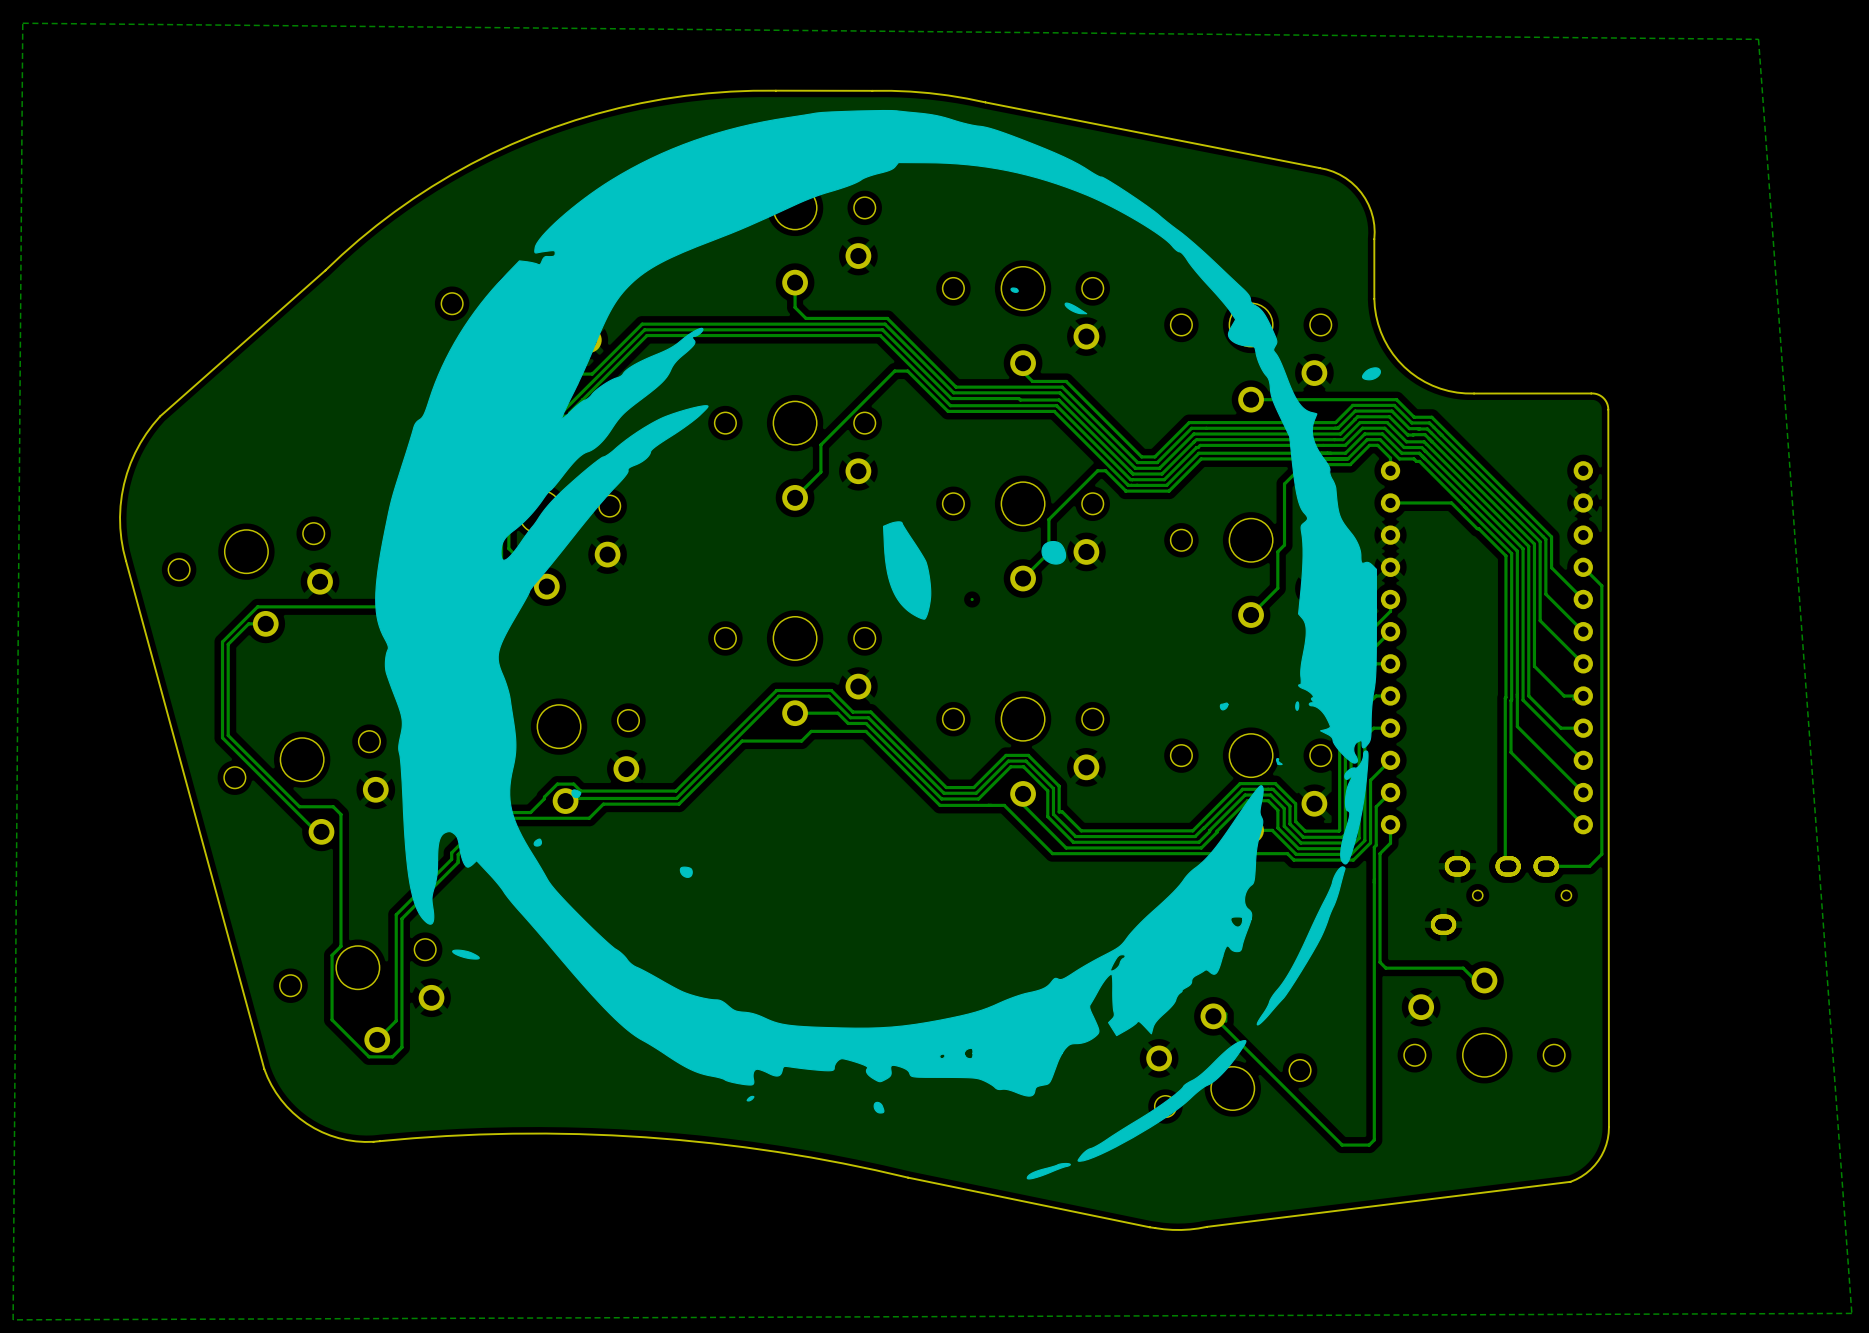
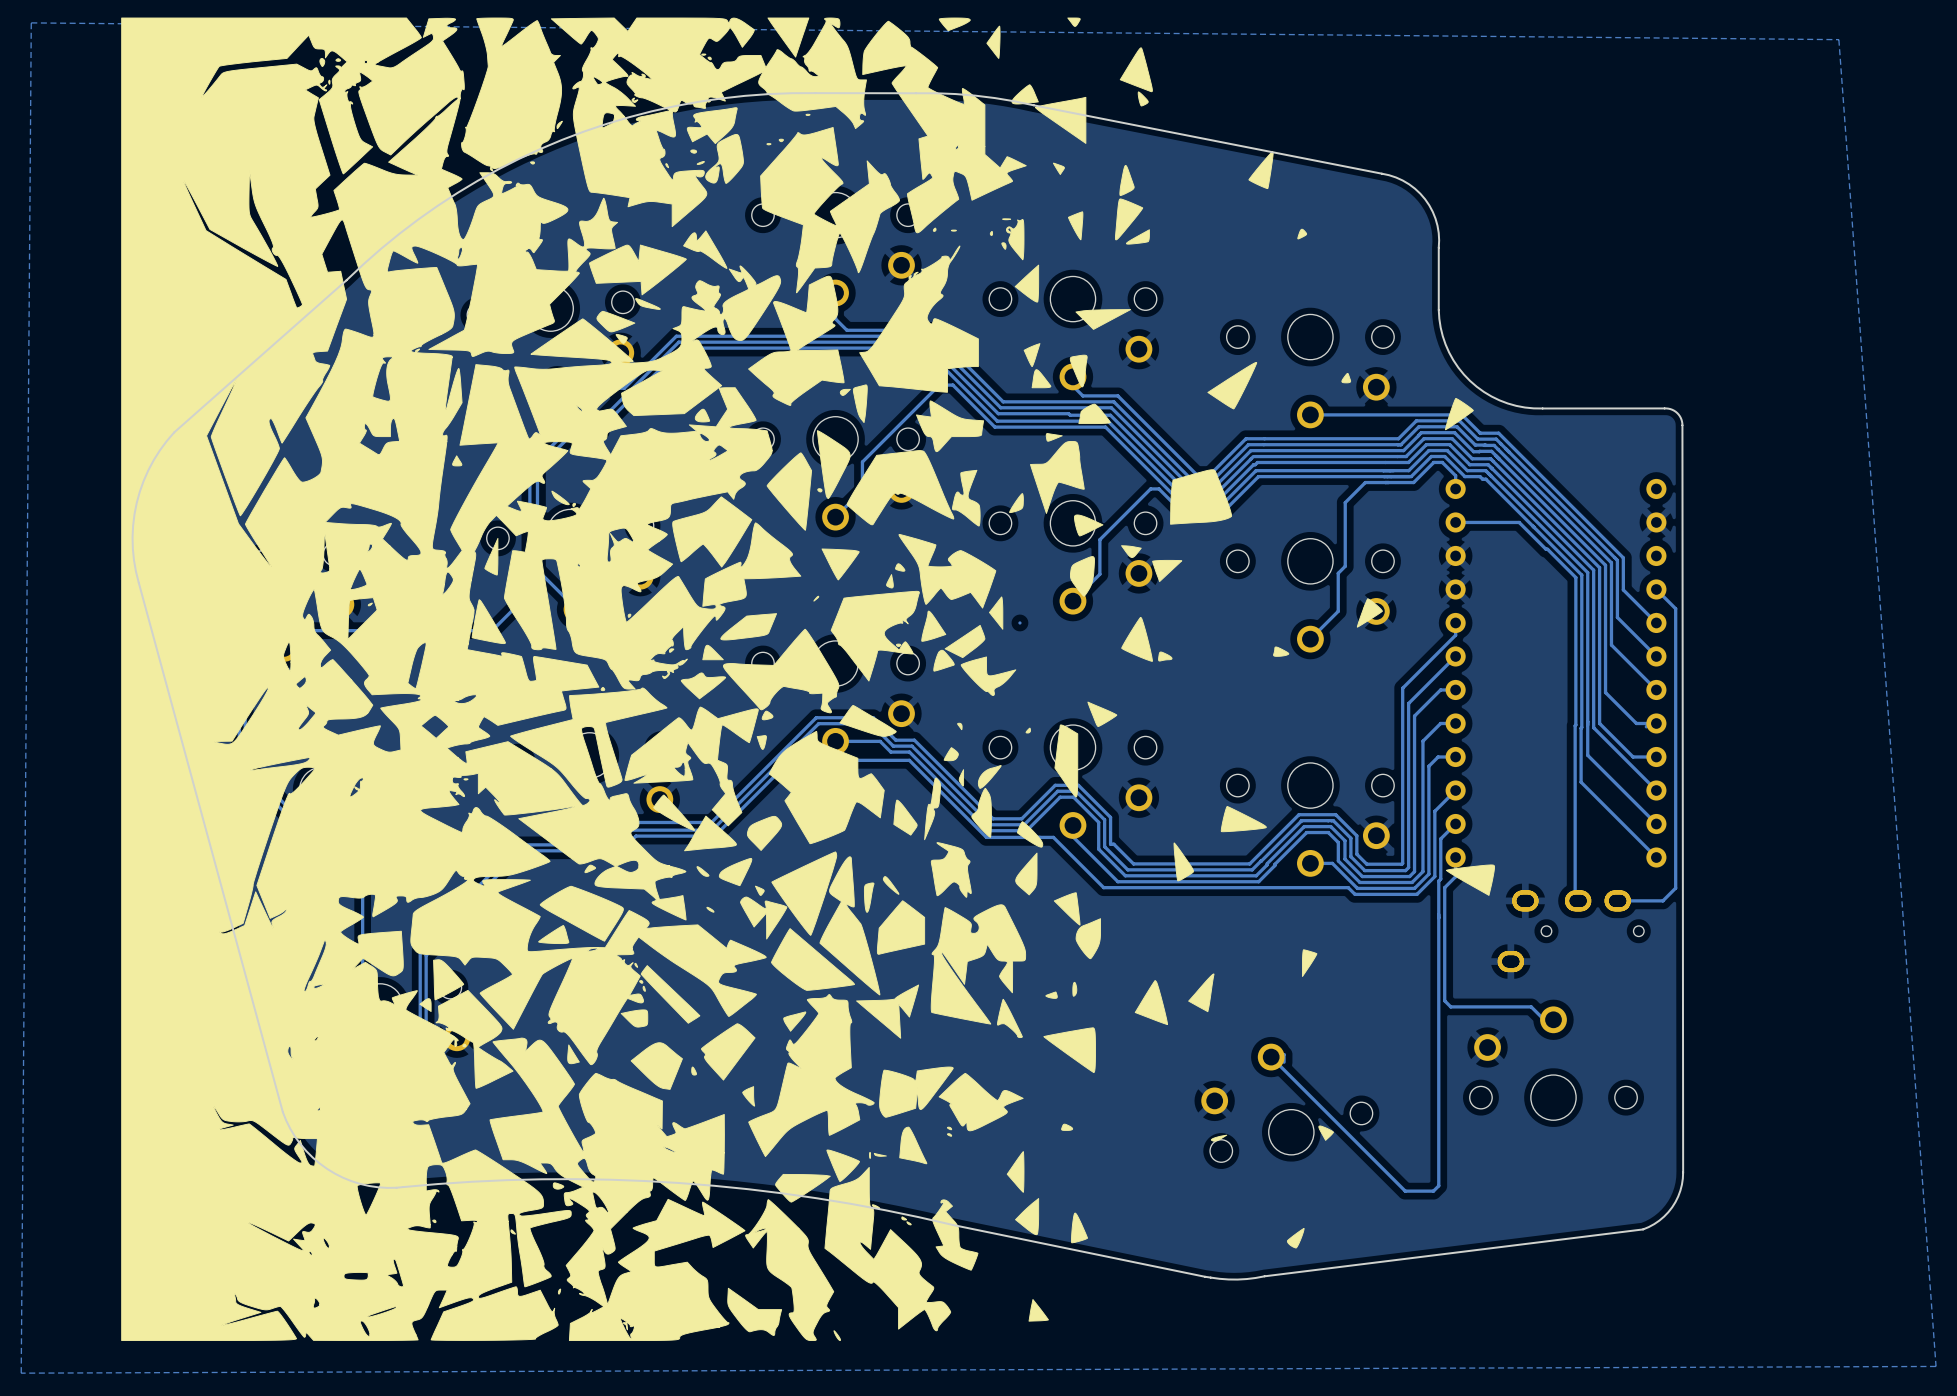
drawing: none -> [121, 17, 1087, 1342]
drawing: none -> [1067, 17, 1081, 27]
drawing: none -> [1119, 47, 1153, 107]
drawing: [375, 109, 1381, 1102] -> none
drawing: none -> [1248, 151, 1274, 190]
drawing: none -> [1053, 162, 1065, 176]
drawing: none -> [1114, 164, 1150, 245]
drawing: none -> [1067, 211, 1084, 241]
drawing: none -> [1297, 228, 1308, 240]
drawing: none -> [1075, 309, 1132, 330]
drawing: none -> [1023, 343, 1052, 389]
drawing: none -> [1069, 354, 1088, 388]
drawing: none -> [1207, 362, 1258, 410]
drawing: none -> [1341, 372, 1352, 384]
drawing: none -> [1445, 398, 1474, 431]
drawing: none -> [1078, 403, 1111, 425]
drawing: none -> [1009, 433, 1104, 537]
drawing: none -> [1170, 469, 1233, 525]
drawing: none -> [1121, 545, 1183, 583]
drawing: none -> [1069, 556, 1095, 597]
drawing: none -> [1356, 598, 1383, 628]
drawing: none -> [1121, 616, 1173, 662]
drawing: none -> [1273, 646, 1290, 657]
drawing: none -> [1054, 701, 1118, 798]
drawing: none -> [957, 722, 963, 731]
drawing: none -> [1025, 727, 1031, 734]
drawing: none -> [1220, 806, 1267, 833]
drawing: none -> [1173, 842, 1194, 882]
drawing: none -> [1446, 864, 1496, 896]
drawing: none -> [1053, 892, 1101, 960]
drawing: none -> [1302, 949, 1318, 977]
drawing: none -> [1188, 973, 1215, 1013]
drawing: none -> [1134, 980, 1168, 1026]
drawing: none -> [1045, 981, 1078, 999]
drawing: none -> [1043, 1027, 1096, 1073]
drawing shape: [1077, 1040, 1247, 1162] -> [1210, 1134, 1228, 1142]
drawing: none -> [1061, 1123, 1074, 1131]
drawing: none -> [1318, 1125, 1334, 1141]
drawing shape: [873, 1101, 885, 1114] -> [899, 1126, 928, 1165]
drawing: none -> [1006, 1151, 1040, 1236]
drawing: [1026, 1162, 1071, 1180] -> none
drawing: none -> [1071, 1212, 1088, 1244]
drawing: none -> [1286, 1227, 1305, 1249]
drawing: none -> [1028, 1299, 1049, 1322]

